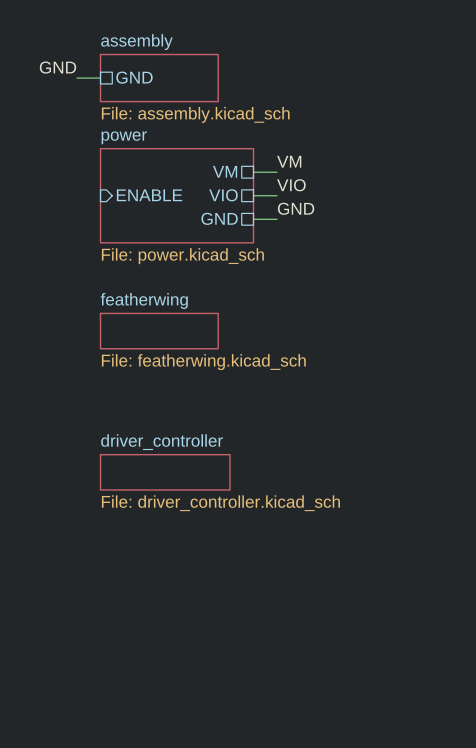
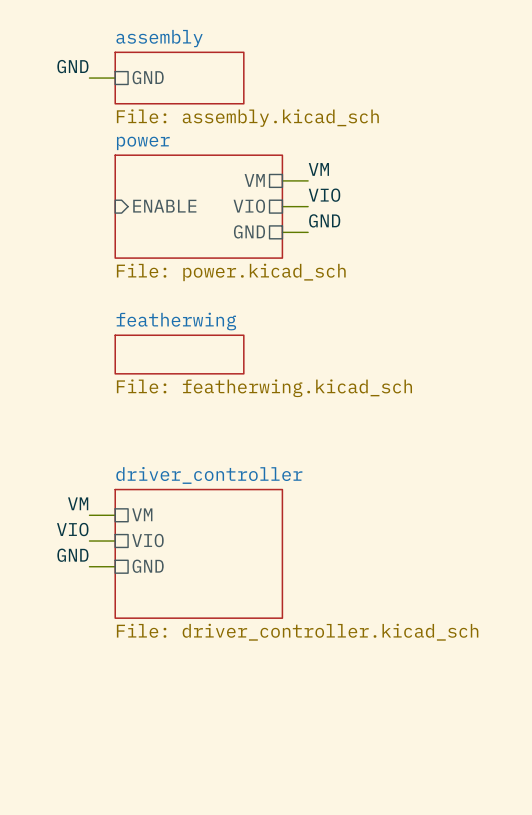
label: none -> VM (78, 503)
sheet driver_controller: File: driver_controller.kicad_sch (165, 472) -> none
sheet pin: none -> VM (142, 514)
wire: none -> (89, 515) (115, 515)
label: none -> VIO (72, 529)
wire: none -> (89, 541) (115, 541)
sheet pin: none -> VIO (147, 540)
sheet driver_controller: none -> File: driver_controller.kicad_sch (198, 553)
label: none -> GND (72, 555)
sheet pin: none -> GND (148, 566)
wire: none -> (89, 566) (115, 566)

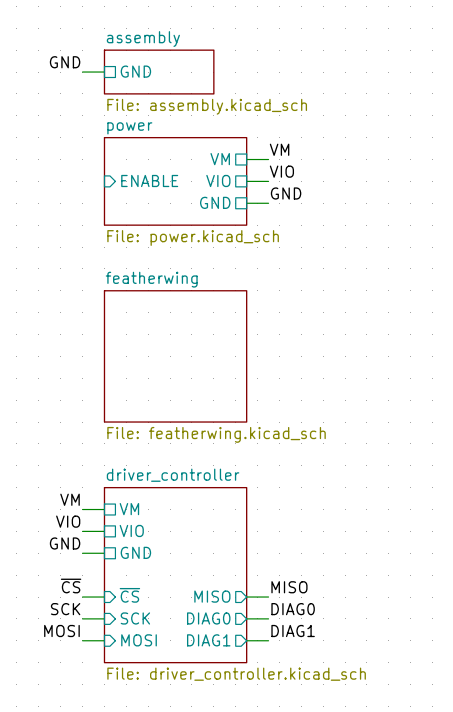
sheet featherwing: File: featherwing.kicad_sch (179, 354) -> none
sheet featherwing: none -> File: featherwing.kicad_sch (175, 356)
label position: VM (78, 503) -> VM (70, 499)
sheet pin position: VM (142, 514) -> VM (129, 509)
wire: (89, 515) (115, 515) -> (82, 509) (104, 509)
label position: VIO (72, 529) -> VIO (68, 521)
sheet pin position: VIO (147, 540) -> VIO (131, 530)
wire: (89, 541) (115, 541) -> (82, 531) (104, 531)
sheet driver_controller: File: driver_controller.kicad_sch (198, 553) -> none
label position: GND (72, 555) -> GND (65, 543)
wire: (89, 566) (115, 566) -> (82, 553) (104, 553)
sheet pin position: GND (148, 566) -> GND (135, 552)
sheet driver_controller: none -> File: driver_controller.kicad_sch (175, 575)
label: none -> ~{CS} (71, 586)
label: none -> MISO (289, 587)
sheet pin: none -> ~{CS} (129, 595)
sheet pin: none -> MISO (212, 596)
wire: none -> (82, 597) (104, 597)
wire: none -> (246, 597) (268, 597)
label: none -> SCK (65, 609)
label: none -> DIAG0 (293, 609)
sheet pin: none -> SCK (135, 618)
sheet pin: none -> DIAG0 (208, 618)
wire: none -> (82, 618) (104, 618)
wire: none -> (246, 618) (268, 618)
label: none -> MOSI (61, 631)
label: none -> DIAG1 (293, 631)
wire: none -> (82, 640) (104, 640)
sheet pin: none -> MOSI (139, 640)
sheet pin: none -> DIAG1 (208, 640)
wire: none -> (246, 640) (268, 640)

